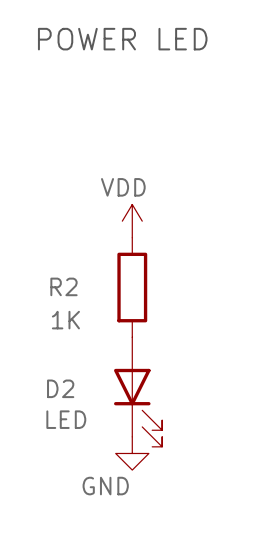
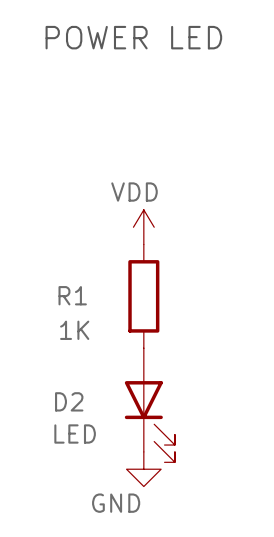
R2 name: R2 (63, 286) -> R1 (72, 295)

